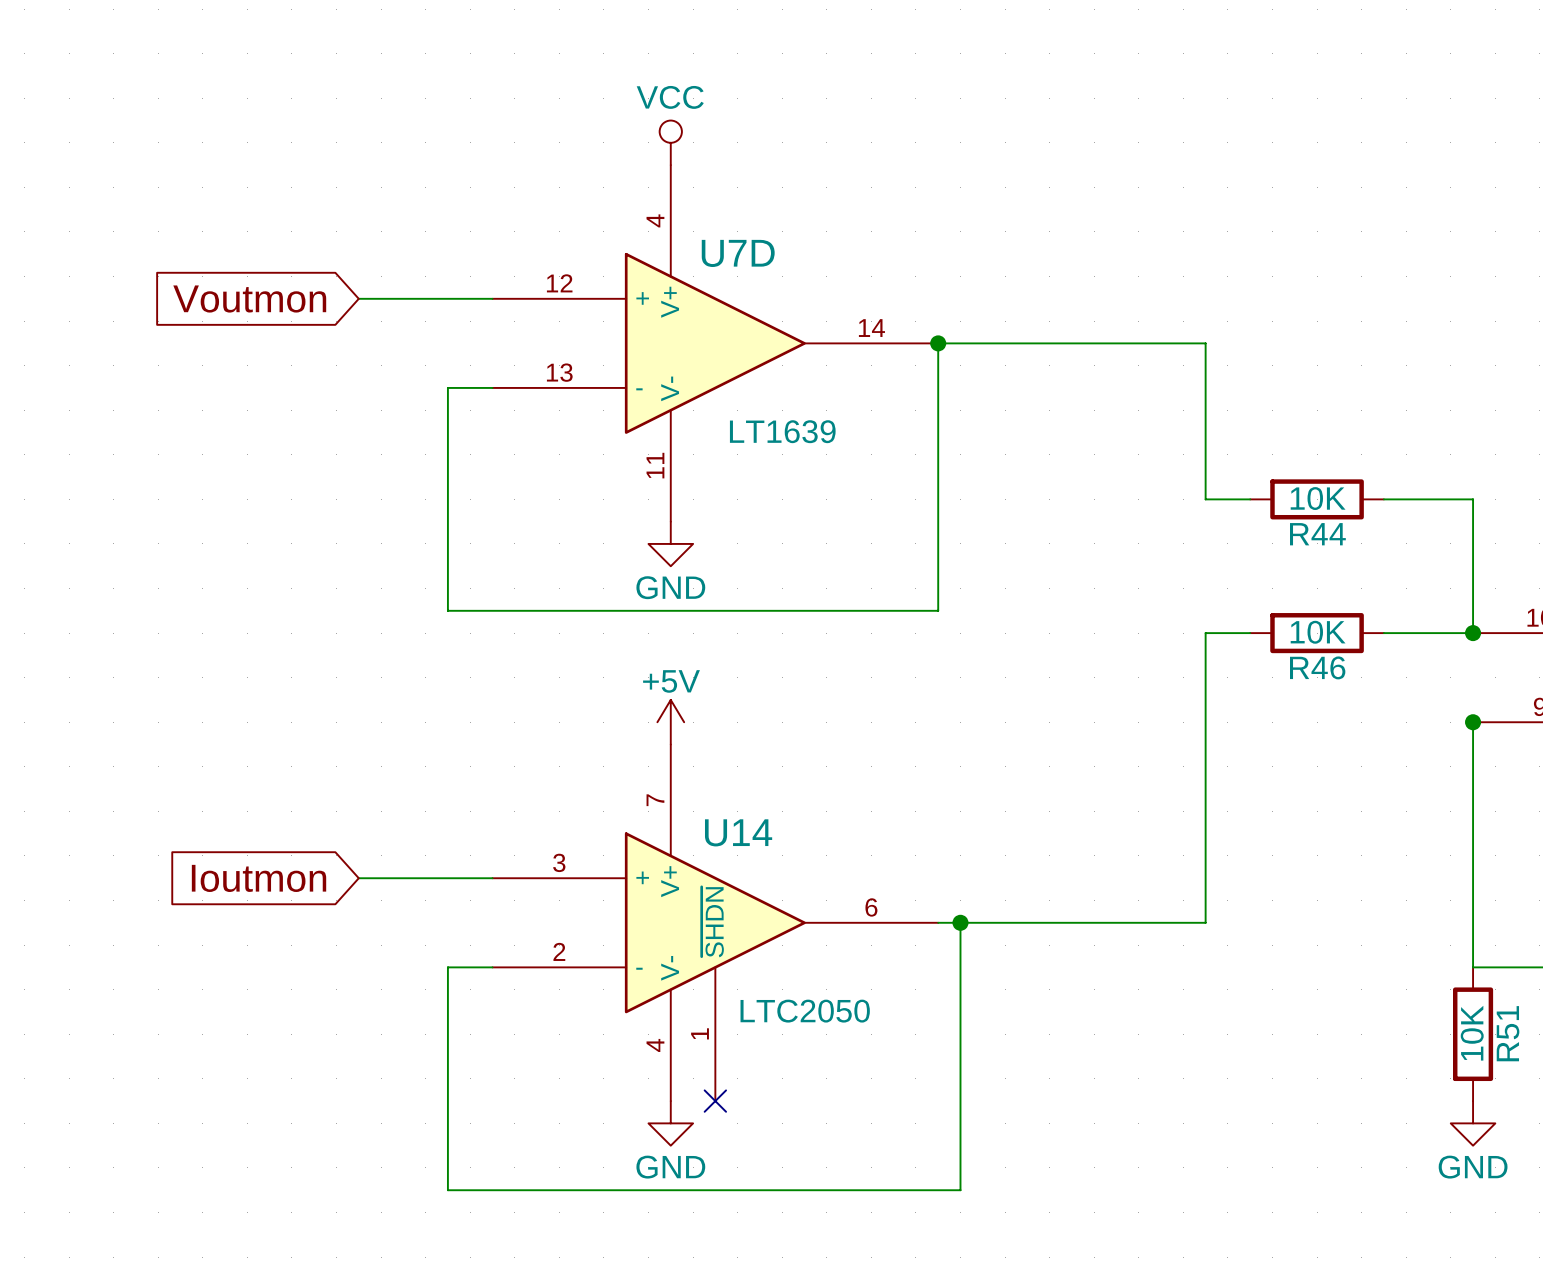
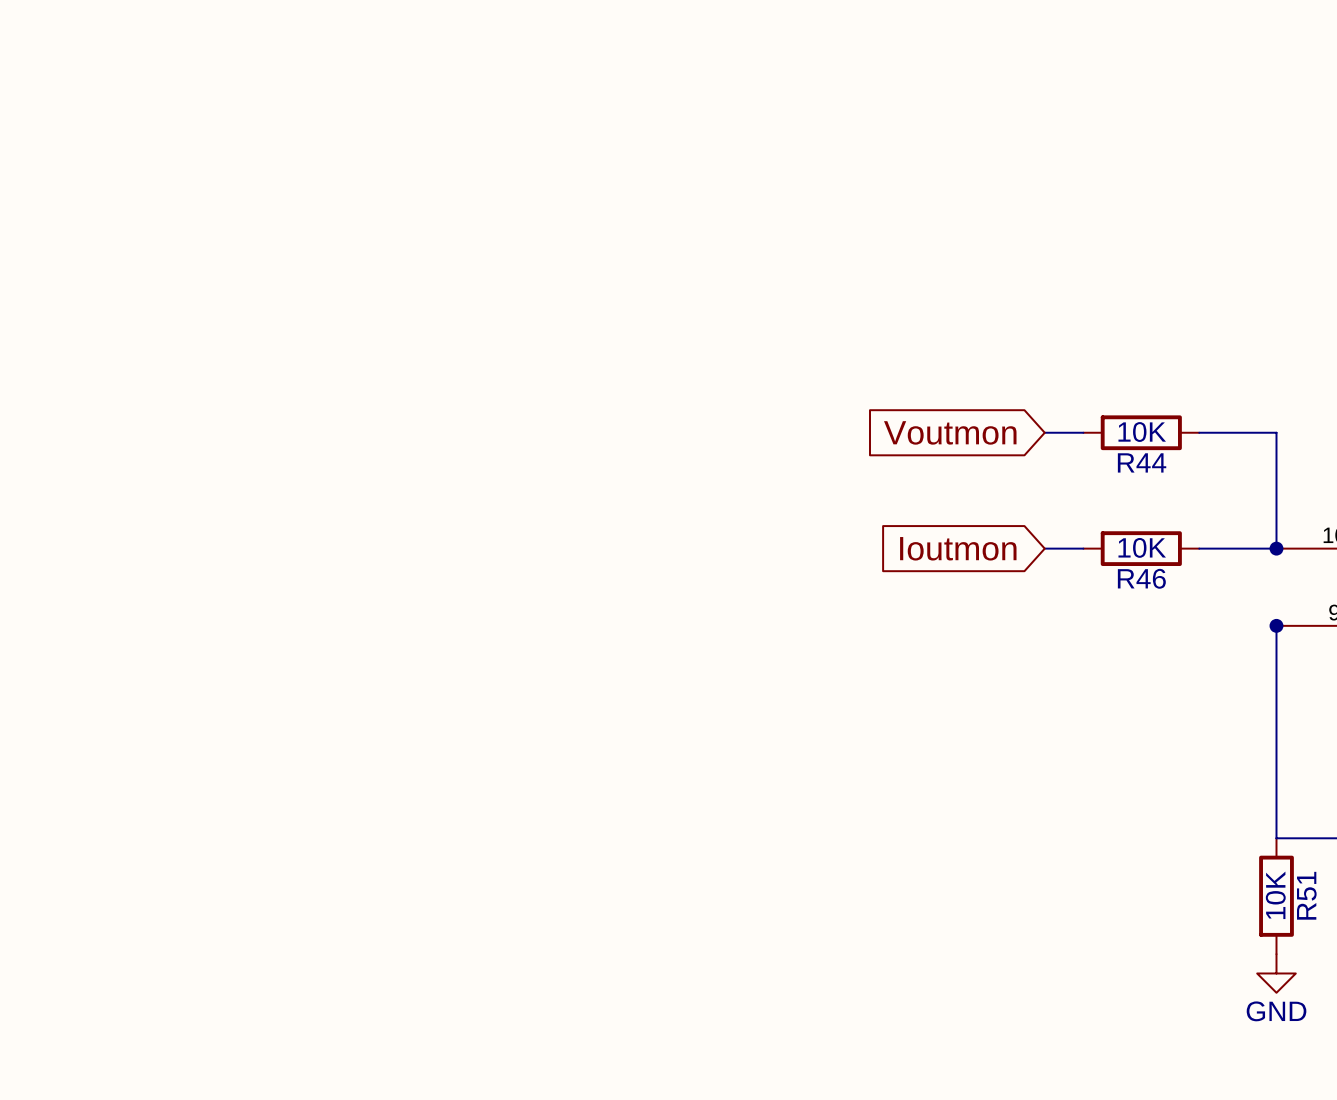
power symbol: VCC (670, 142) -> none
wire: (358, 298) (492, 298) -> none
global label: Voutmon (249, 299) -> none
U7D: LT1639 (715, 343) -> none
junction: (938, 343) -> none
wire: (492, 387) (447, 387) (447, 610) (938, 610) (938, 343) (1205, 343) (1205, 499) -> none
global label: none -> Voutmon (950, 432)
power symbol: GND (670, 543) -> none
global label: none -> Ioutmon (958, 548)
wire: (1205, 633) (1205, 922) (938, 922) -> none
power symbol: +5V (670, 722) -> none
global label: Ioutmon (259, 878) -> none
wire: (358, 878) (492, 878) -> none
U14: LTC2050 (715, 922) -> none
wire: (960, 922) (960, 1190) (447, 1190) (447, 967) (492, 967) -> none
junction: (960, 922) -> none
no-connect mark: (715, 1101) -> none
power symbol: GND (670, 1123) -> none

